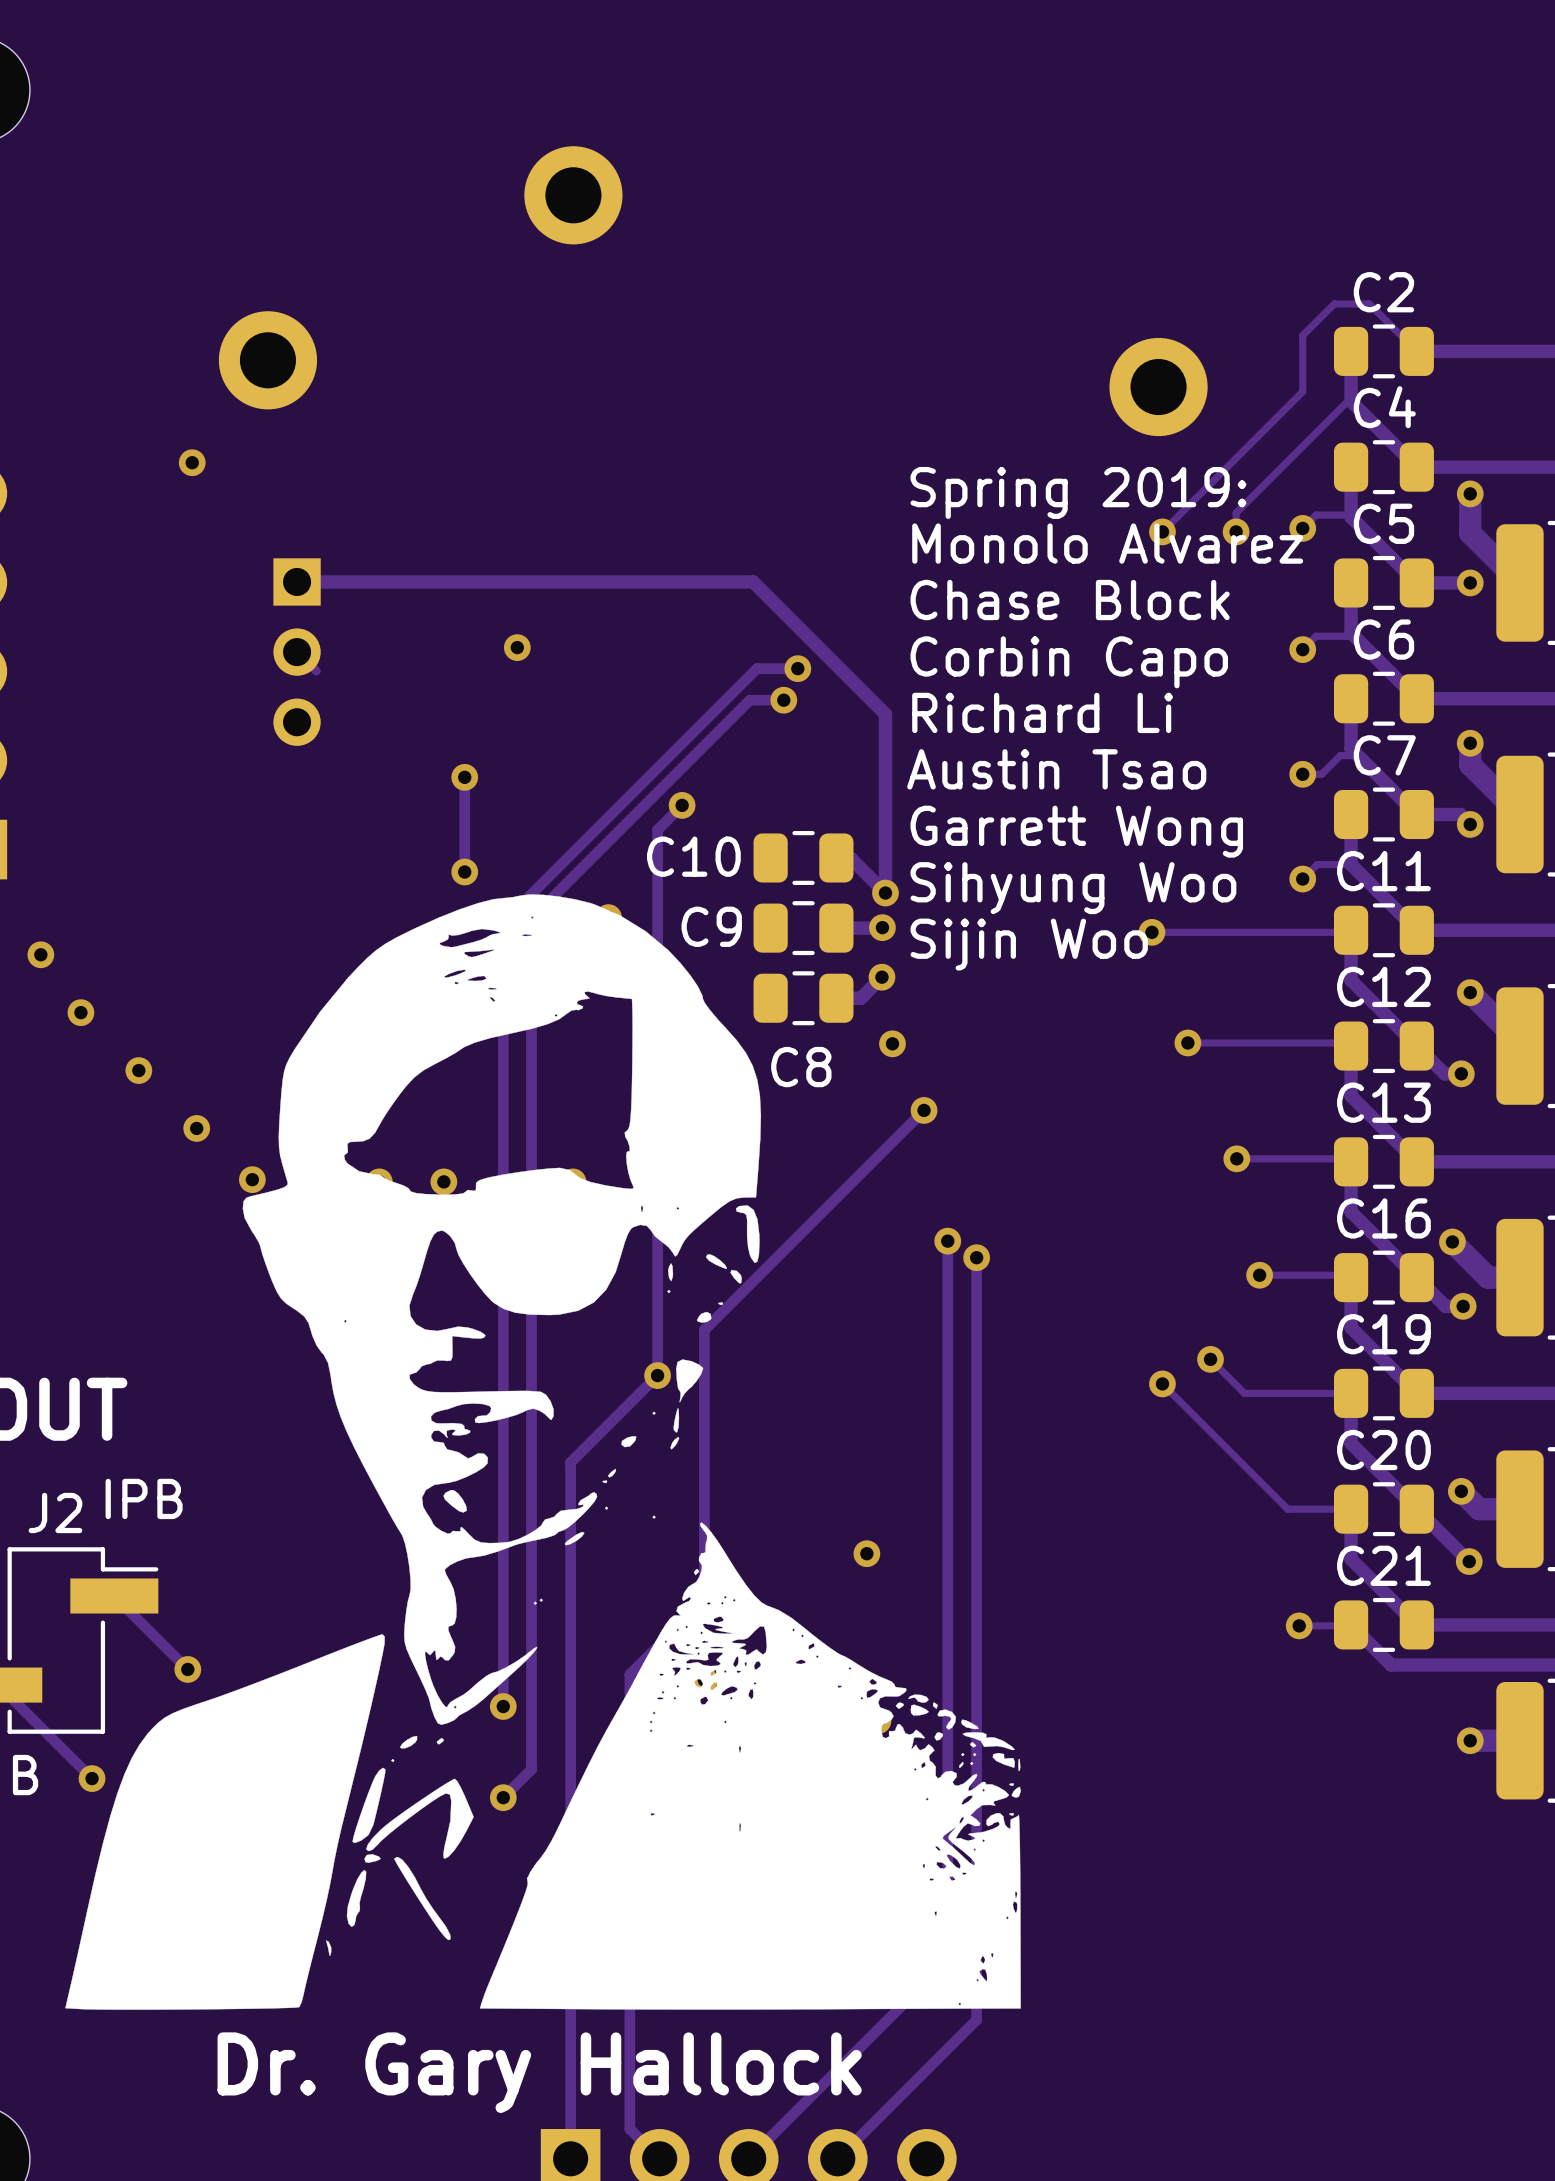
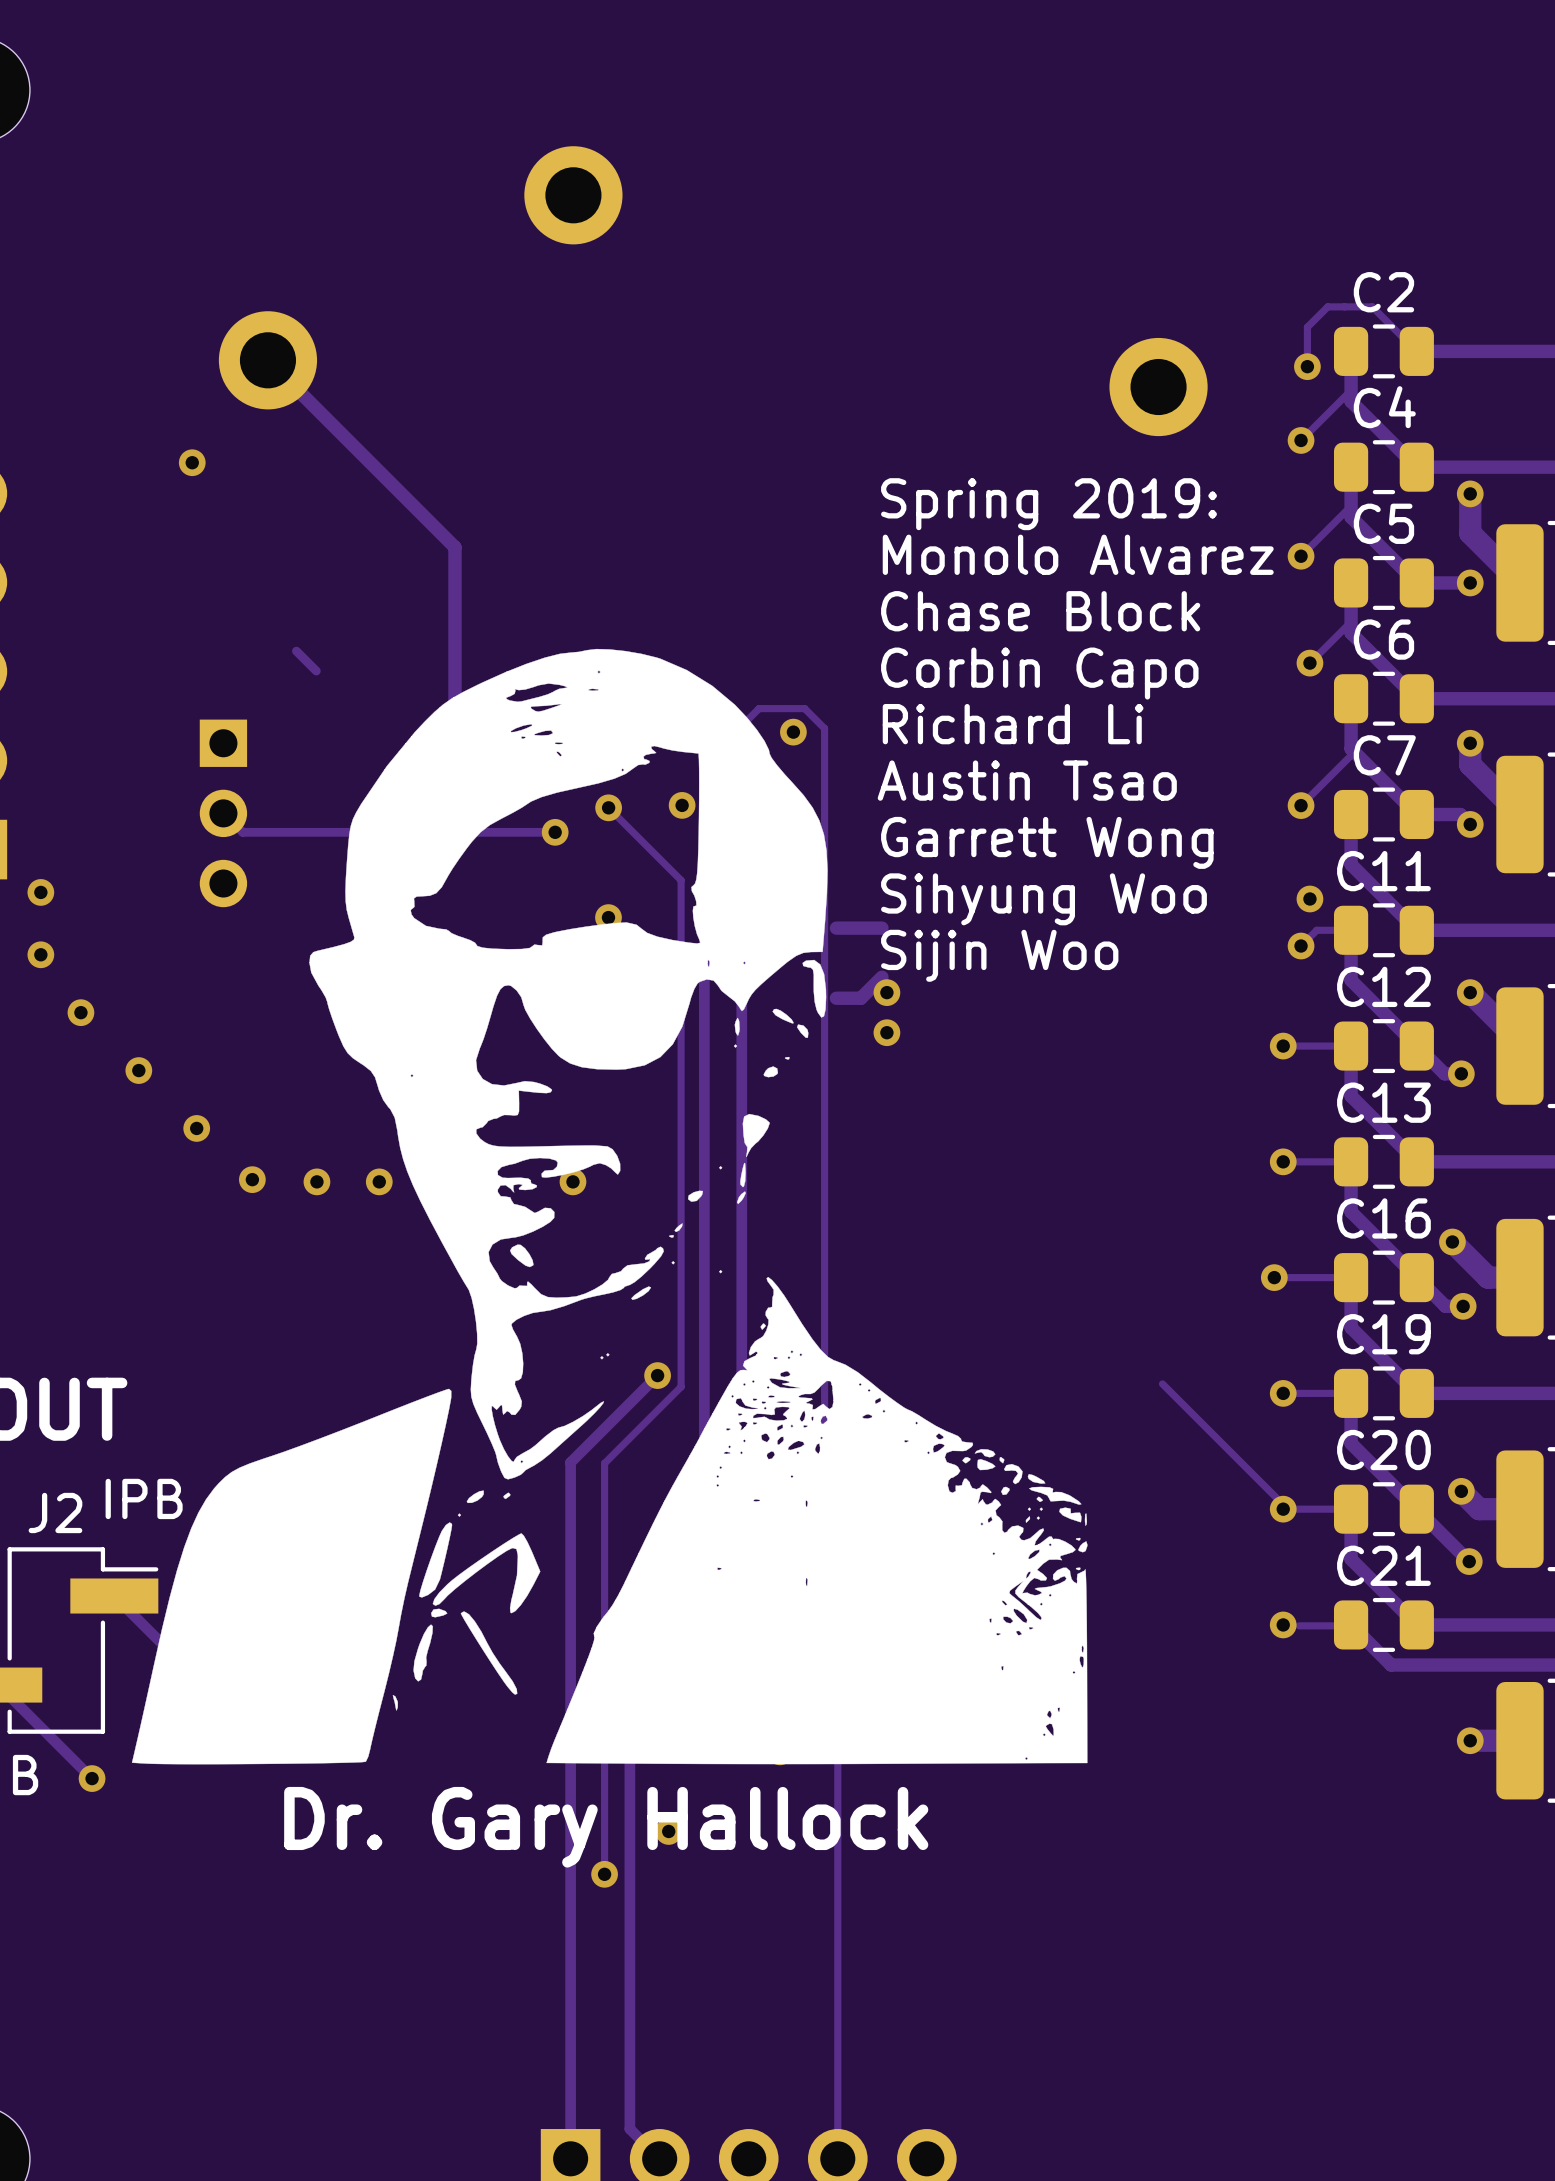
track: (1372, 306) (1369, 303) (1334, 303) (1302, 335) (1302, 391) (1162, 531) -> (1372, 306) (1327, 306) (1307, 327) (1307, 366)
track: none -> (267, 360) (454, 547) (454, 805)
via: none -> (1307, 366)
track: none -> (1351, 390) (1301, 440)
track: (1351, 401) (1347, 401) (1236, 513) (1236, 531) -> none
via: none -> (1301, 440)
text position: Spring 2019: (1078, 492) -> Spring 2019: (1048, 504)
track: none -> (1351, 506) (1301, 556)
track: (1351, 517) (1348, 515) (1316, 515) (1302, 528) -> none
via position: (1302, 528) -> (1301, 556)
via: (1162, 531) -> none
via: (1236, 531) -> none
text position: Monolo Alvarez (1107, 543) -> Monolo Alvarez (1078, 554)
track: (297, 581) (753, 581) (885, 714) (885, 893) (850, 857) (836, 857) -> none
text position: Chase Block (1070, 600) -> Chase Block (1040, 611)
track: none -> (1351, 621) (1309, 663)
track: (1351, 632) (1347, 636) (1316, 636) (1302, 649) -> none
via: (517, 647) -> none
via position: (1302, 649) -> (1309, 663)
part position: (297, 652) -> (223, 813)
text position: Corbin Capo (1069, 662) -> Corbin Capo (1039, 673)
track: (797, 668) (756, 668) (503, 922) (503, 1706) -> none
via: (797, 668) -> none
track: (783, 700) (749, 700) (531, 918) (531, 1769) (503, 1797) -> none
via: (783, 700) -> none
text position: Richard Li (1042, 712) -> Richard Li (1013, 724)
via: none -> (793, 732)
track: (1351, 755) (1340, 755) (1321, 774) (1302, 774) -> (1351, 755) (1301, 805)
text position: Austin Tsao (1056, 769) -> Austin Tsao (1027, 780)
via position: (1302, 774) -> (1301, 805)
track: (464, 777) (464, 872) -> none
track: none -> (741, 787) (741, 1375)
track: (682, 805) (657, 829) (657, 1375) -> none
track: none -> (608, 807) (681, 880) (681, 1386) (604, 1463) (604, 1874)
via: none -> (608, 807)
track: none -> (222, 812) (242, 832) (555, 832)
text position: Garrett Wong (1076, 831) -> Garrett Wong (1047, 842)
via: none -> (555, 832)
C10: (803, 857) -> none
track: (1351, 864) (1317, 864) (1302, 879) -> none
via: (464, 872) -> none
via position: (1302, 879) -> (1309, 898)
text position: Sihyung Woo (1073, 888) -> Sihyung Woo (1043, 899)
via: none -> (40, 892)
via: (885, 893) -> none
via: (882, 927) -> none
C9: (803, 928) -> none
track: (1351, 930) (1349, 932) (1151, 932) -> (1351, 930) (1316, 930) (1301, 946)
via: (1151, 932) -> none
text position: Sijin Woo (1029, 944) -> Sijin Woo (999, 955)
via: none -> (1301, 946)
via position: (881, 977) -> (886, 992)
C8: (803, 998) -> none
track: (1187, 1042) (1347, 1042) (1351, 1046) -> (1283, 1046) (1351, 1046)
via: (1187, 1042) -> none
via position: (892, 1043) -> (886, 1032)
via: none -> (1283, 1046)
track: (924, 1110) (704, 1330) -> (704, 814) (704, 1330)
via: (924, 1110) -> none
track: (1236, 1158) (1348, 1158) (1351, 1161) -> (1283, 1161) (1351, 1161)
via position: (1236, 1158) -> (1283, 1161)
track: (947, 1241) (947, 1959) (748, 2158) -> none
via: (947, 1241) -> none
track: (976, 1257) (976, 2019) (837, 2158) -> (724, 743) (759, 708) (804, 708) (824, 728) (824, 1720) (837, 1733) (837, 2158)
via: (976, 1257) -> none
track: (1259, 1275) (1348, 1275) (1351, 1277) -> (1274, 1277) (1351, 1277)
via position: (1259, 1275) -> (1274, 1277)
track: (1210, 1359) (1244, 1393) (1283, 1393) -> none
via: (1210, 1359) -> none
via: (1162, 1383) -> none
via: none -> (1283, 1393)
drawing position: (543, 1452) -> (609, 1206)
via: none -> (1283, 1509)
via position: (1299, 1625) -> (1283, 1624)
via: (503, 1706) -> none
via: (503, 1797) -> none
via: none -> (604, 1874)
text position: Dr. Gary Hallock (539, 2072) -> Dr. Gary Hallock (606, 1827)

